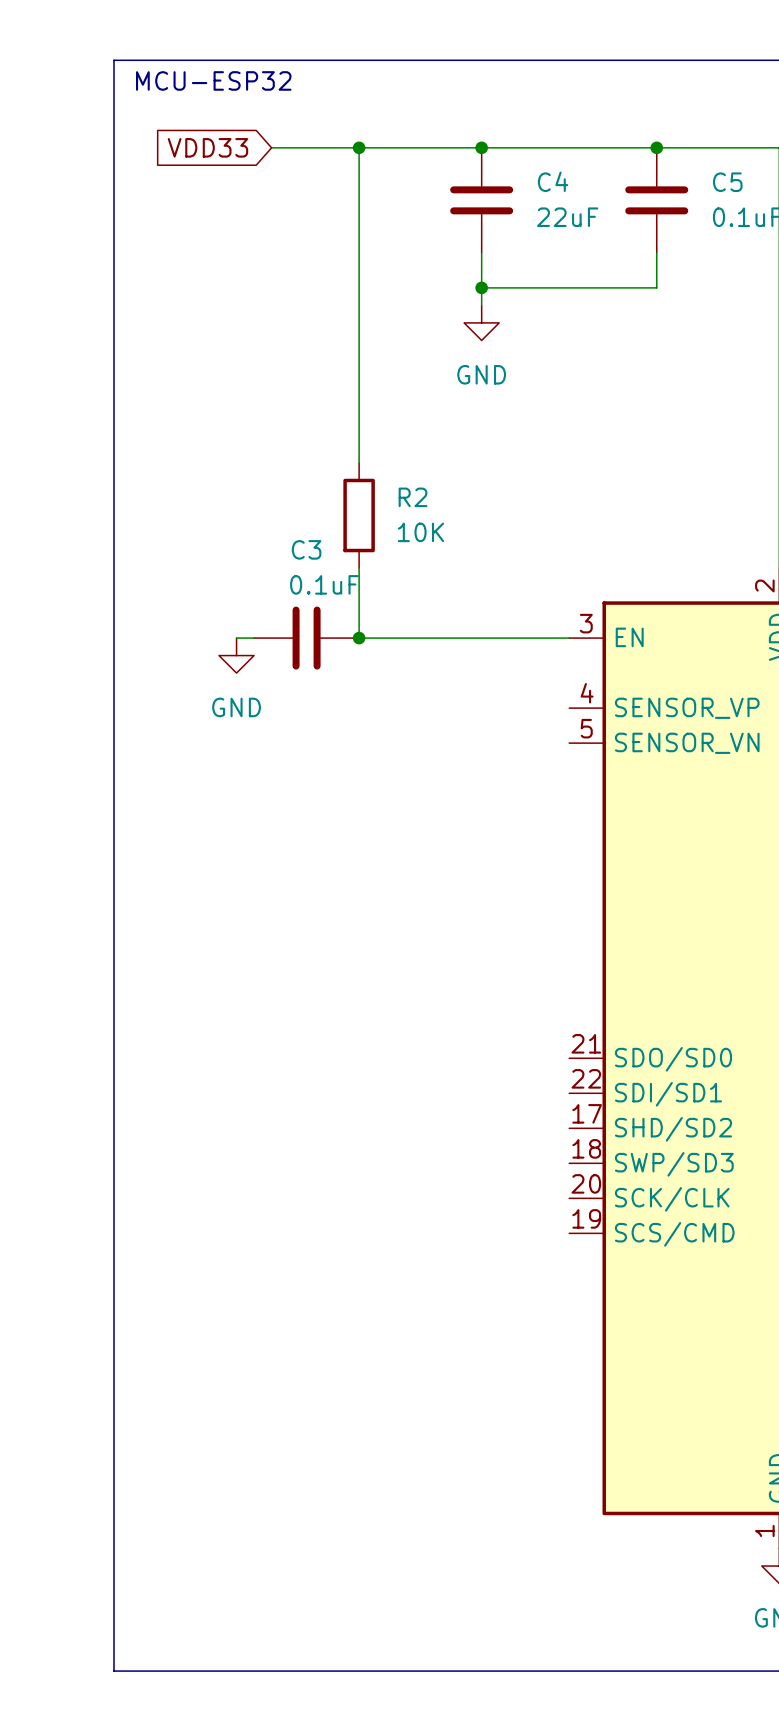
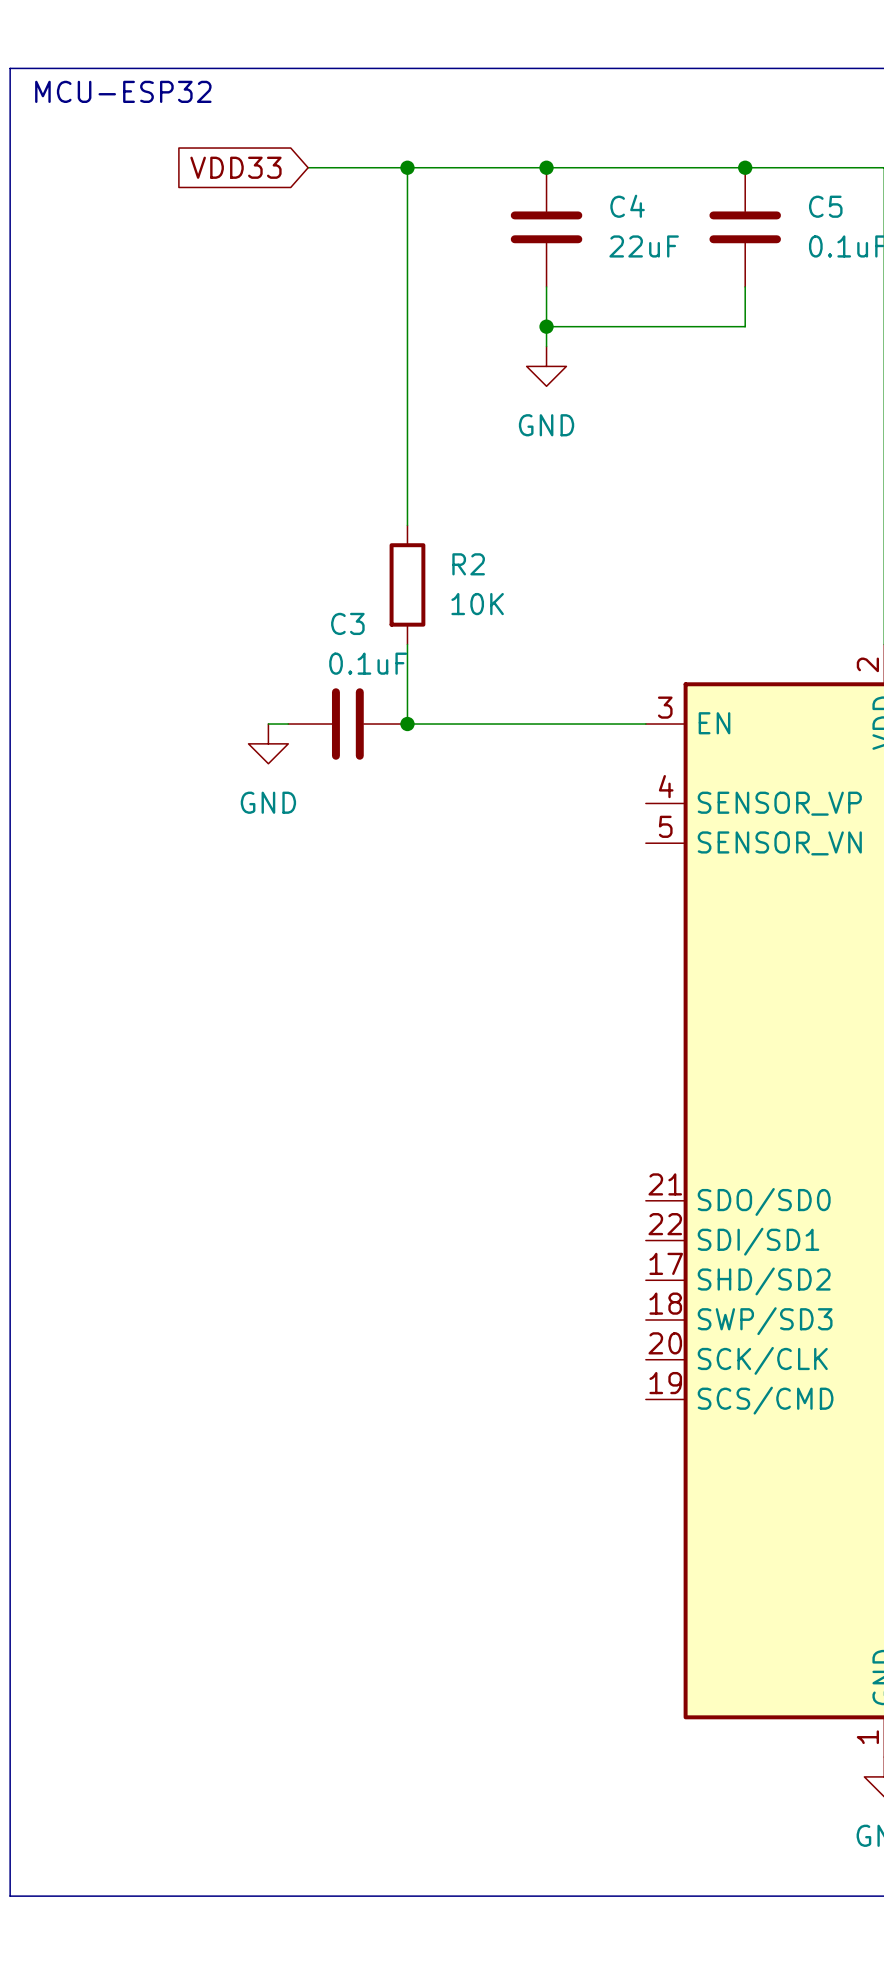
line: (113, 60) (113, 1671) -> (129, 68) (10, 68) (10, 1896) (129, 1896)
text position: MCU-ESP32 (213, 80) -> MCU-ESP32 (123, 91)

